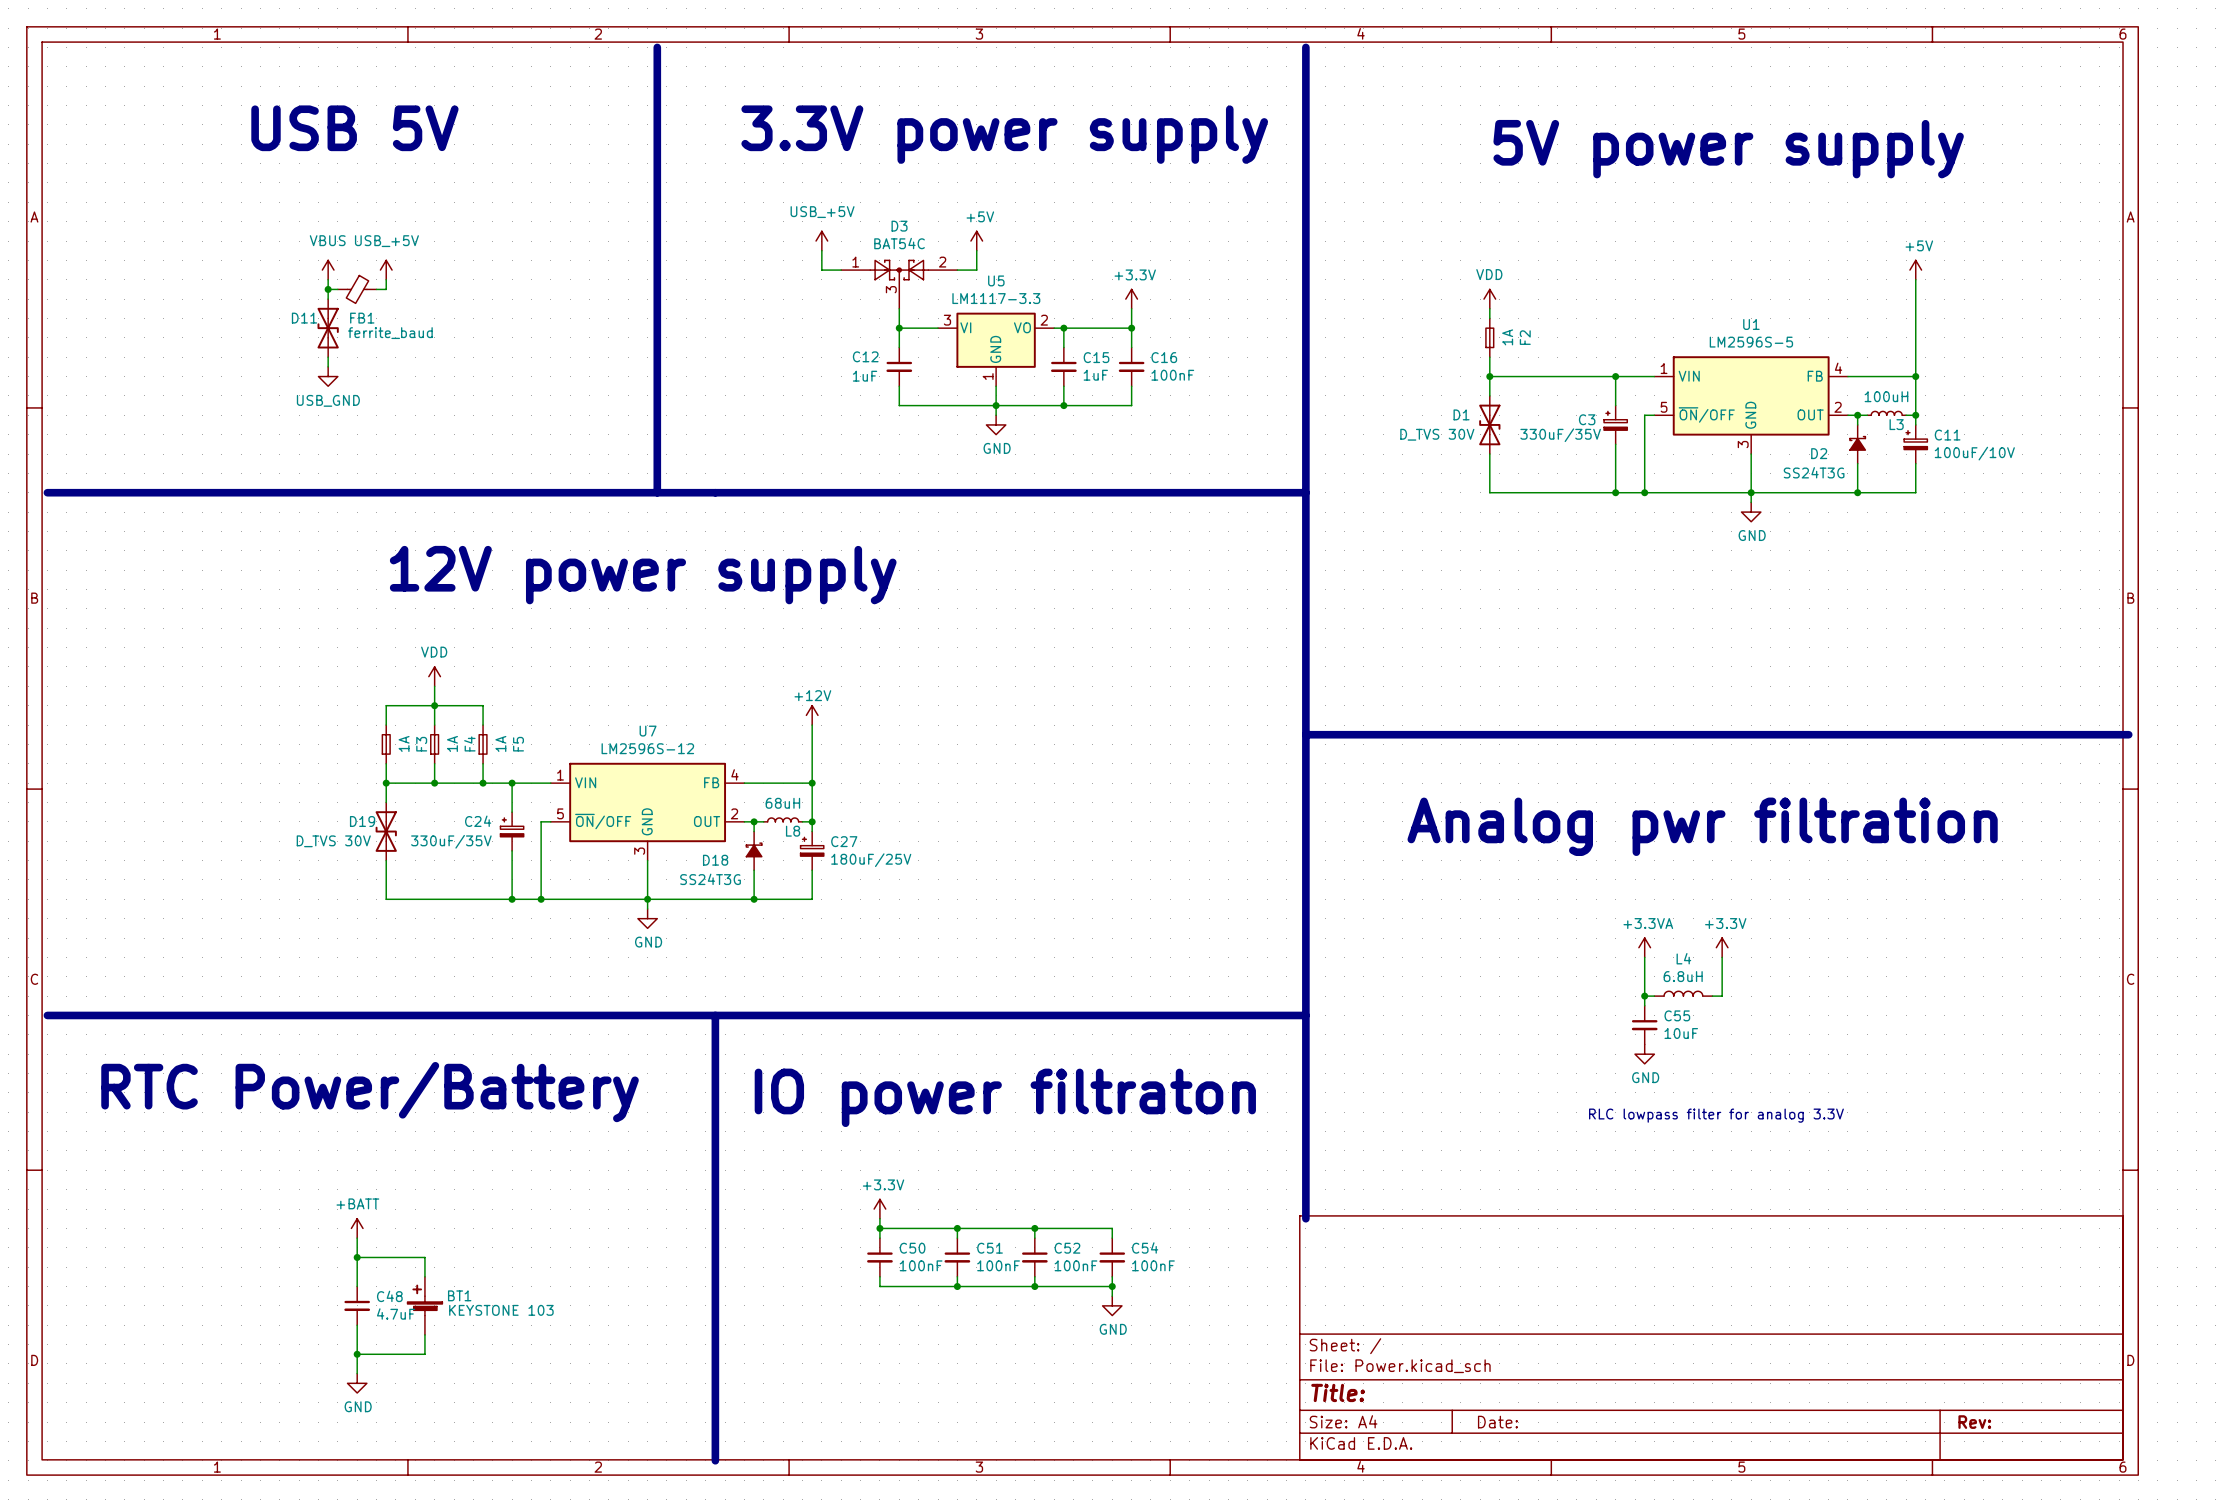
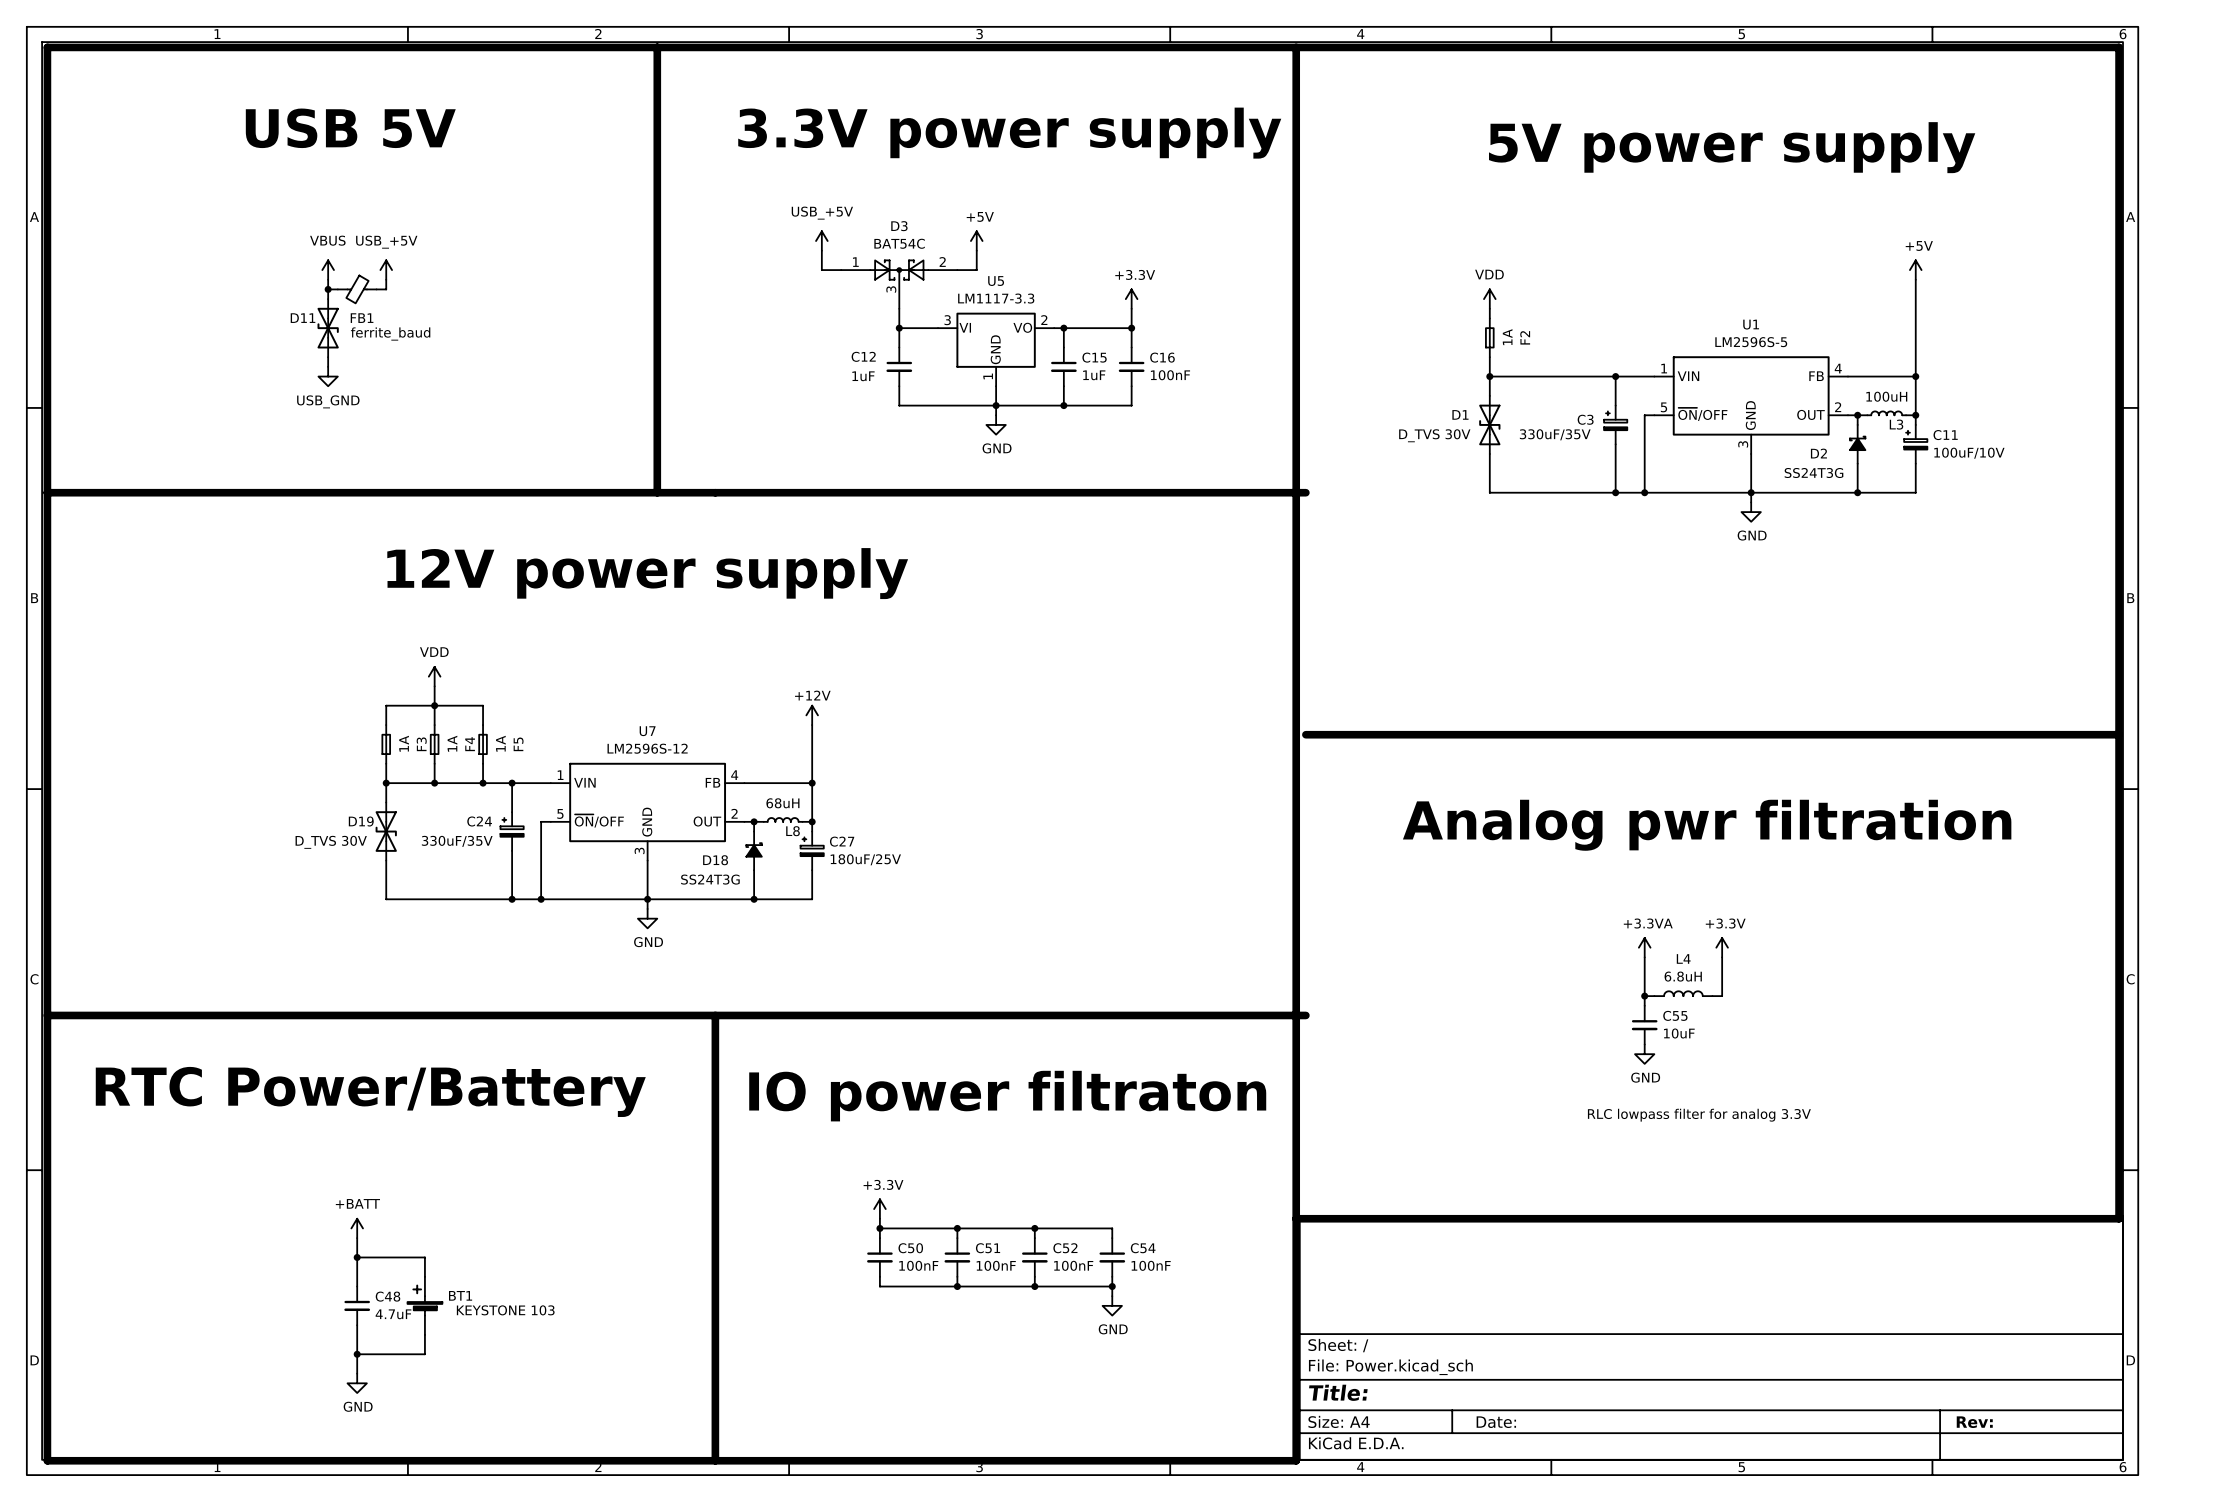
line: none -> (1296, 47) (1296, 1460) (47, 1460) (47, 47) (2119, 47) (2119, 1218) (1296, 1218)
line: (1305, 47) (1305, 1218) -> none
line: (2119, 734) (2128, 734) -> none

